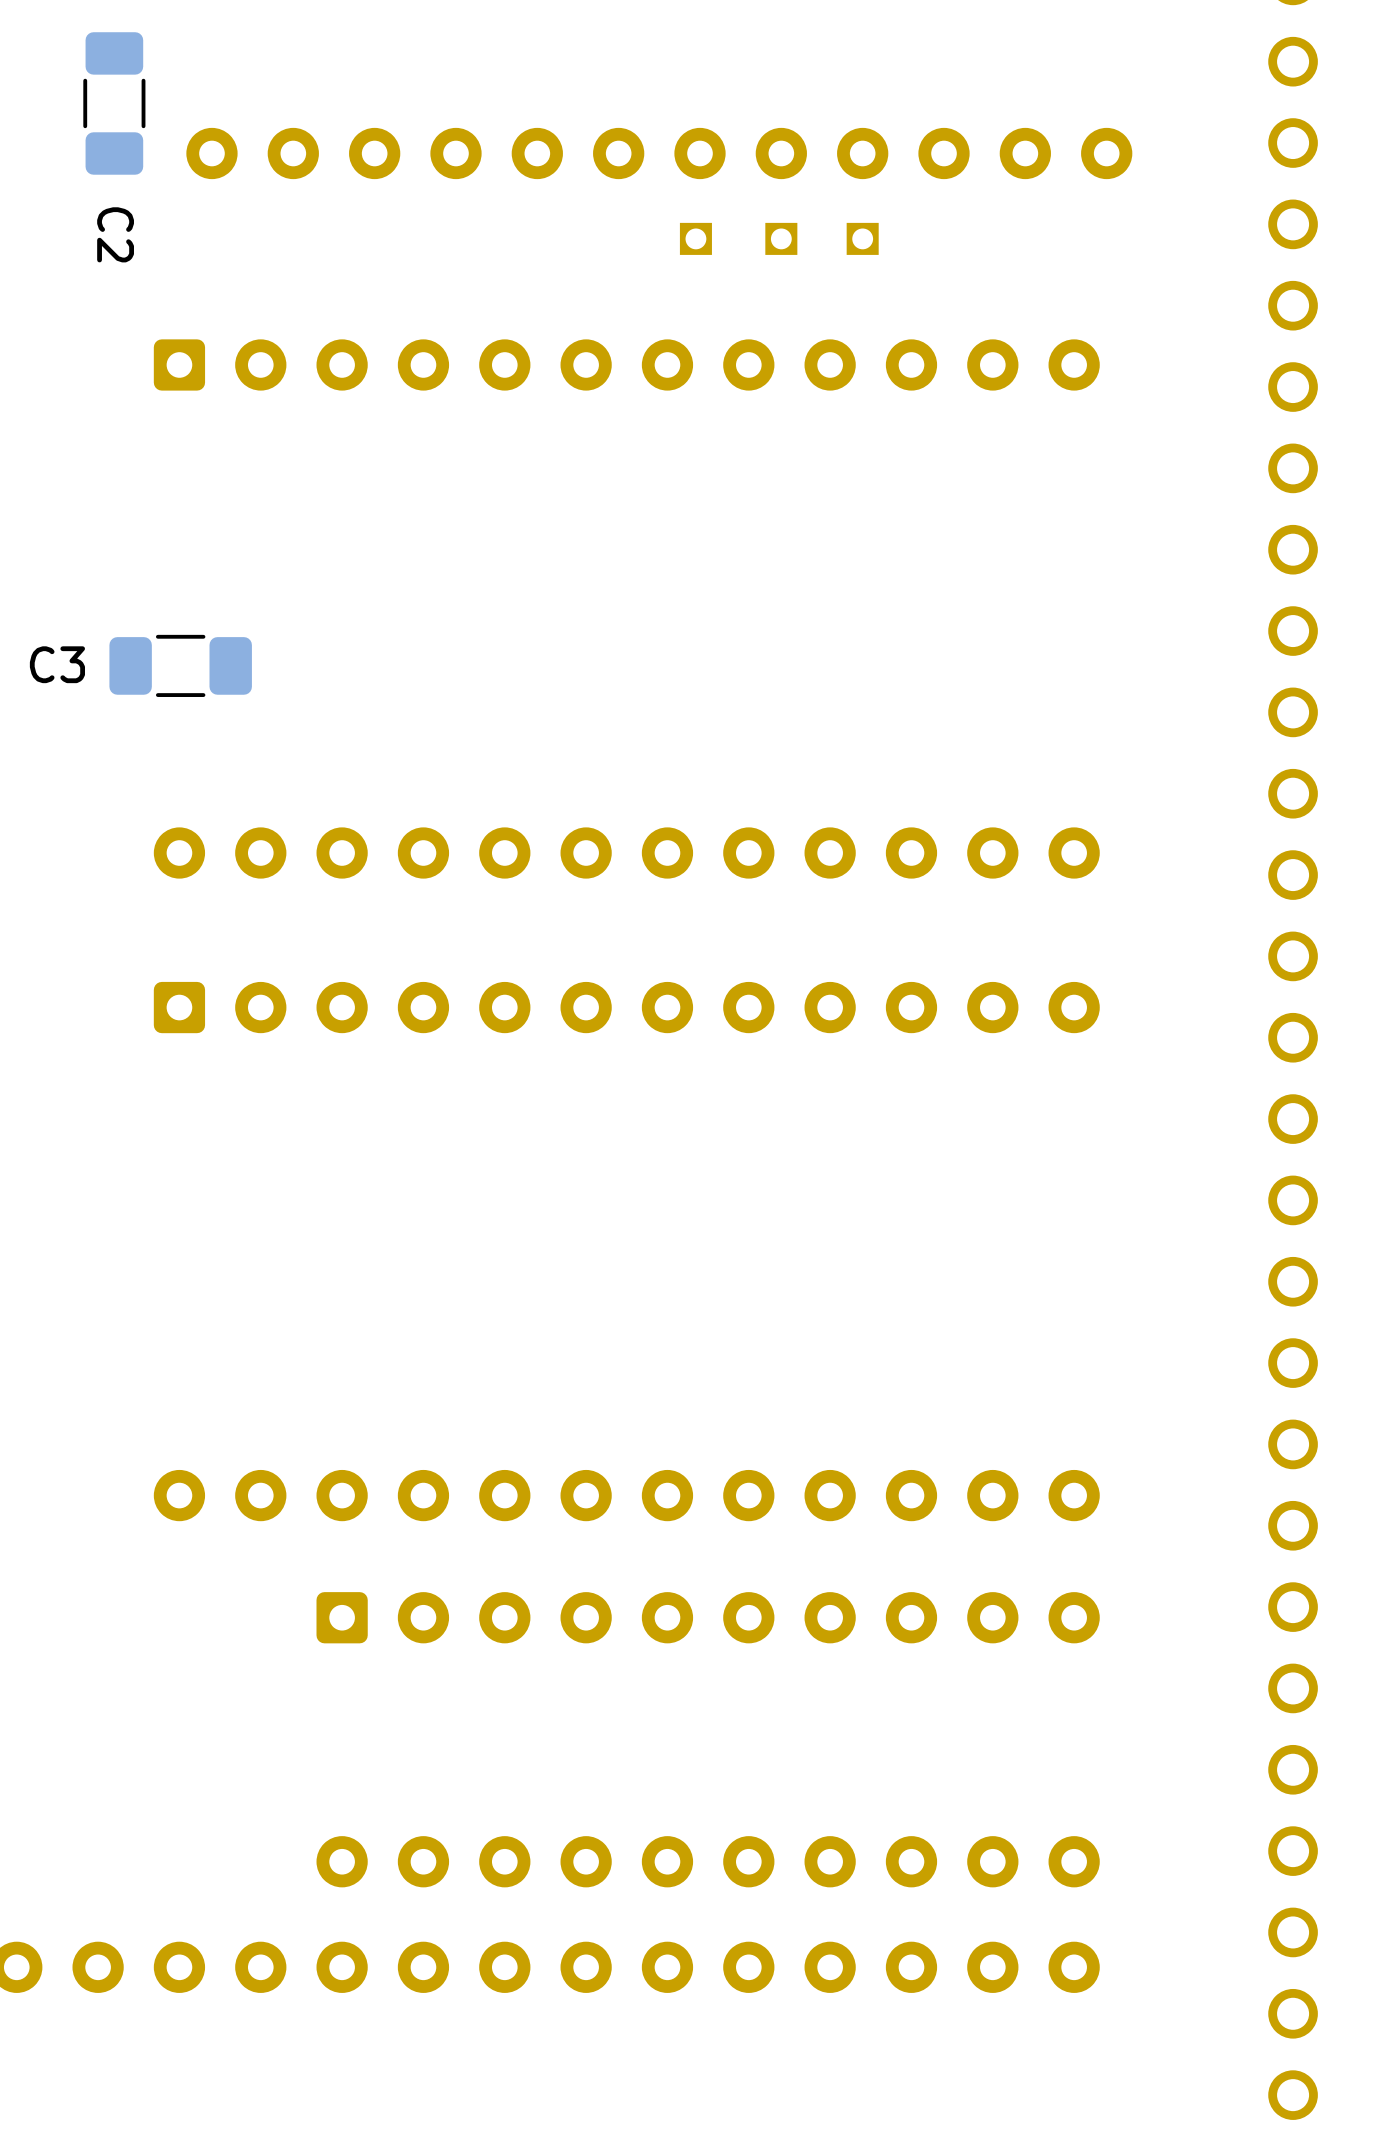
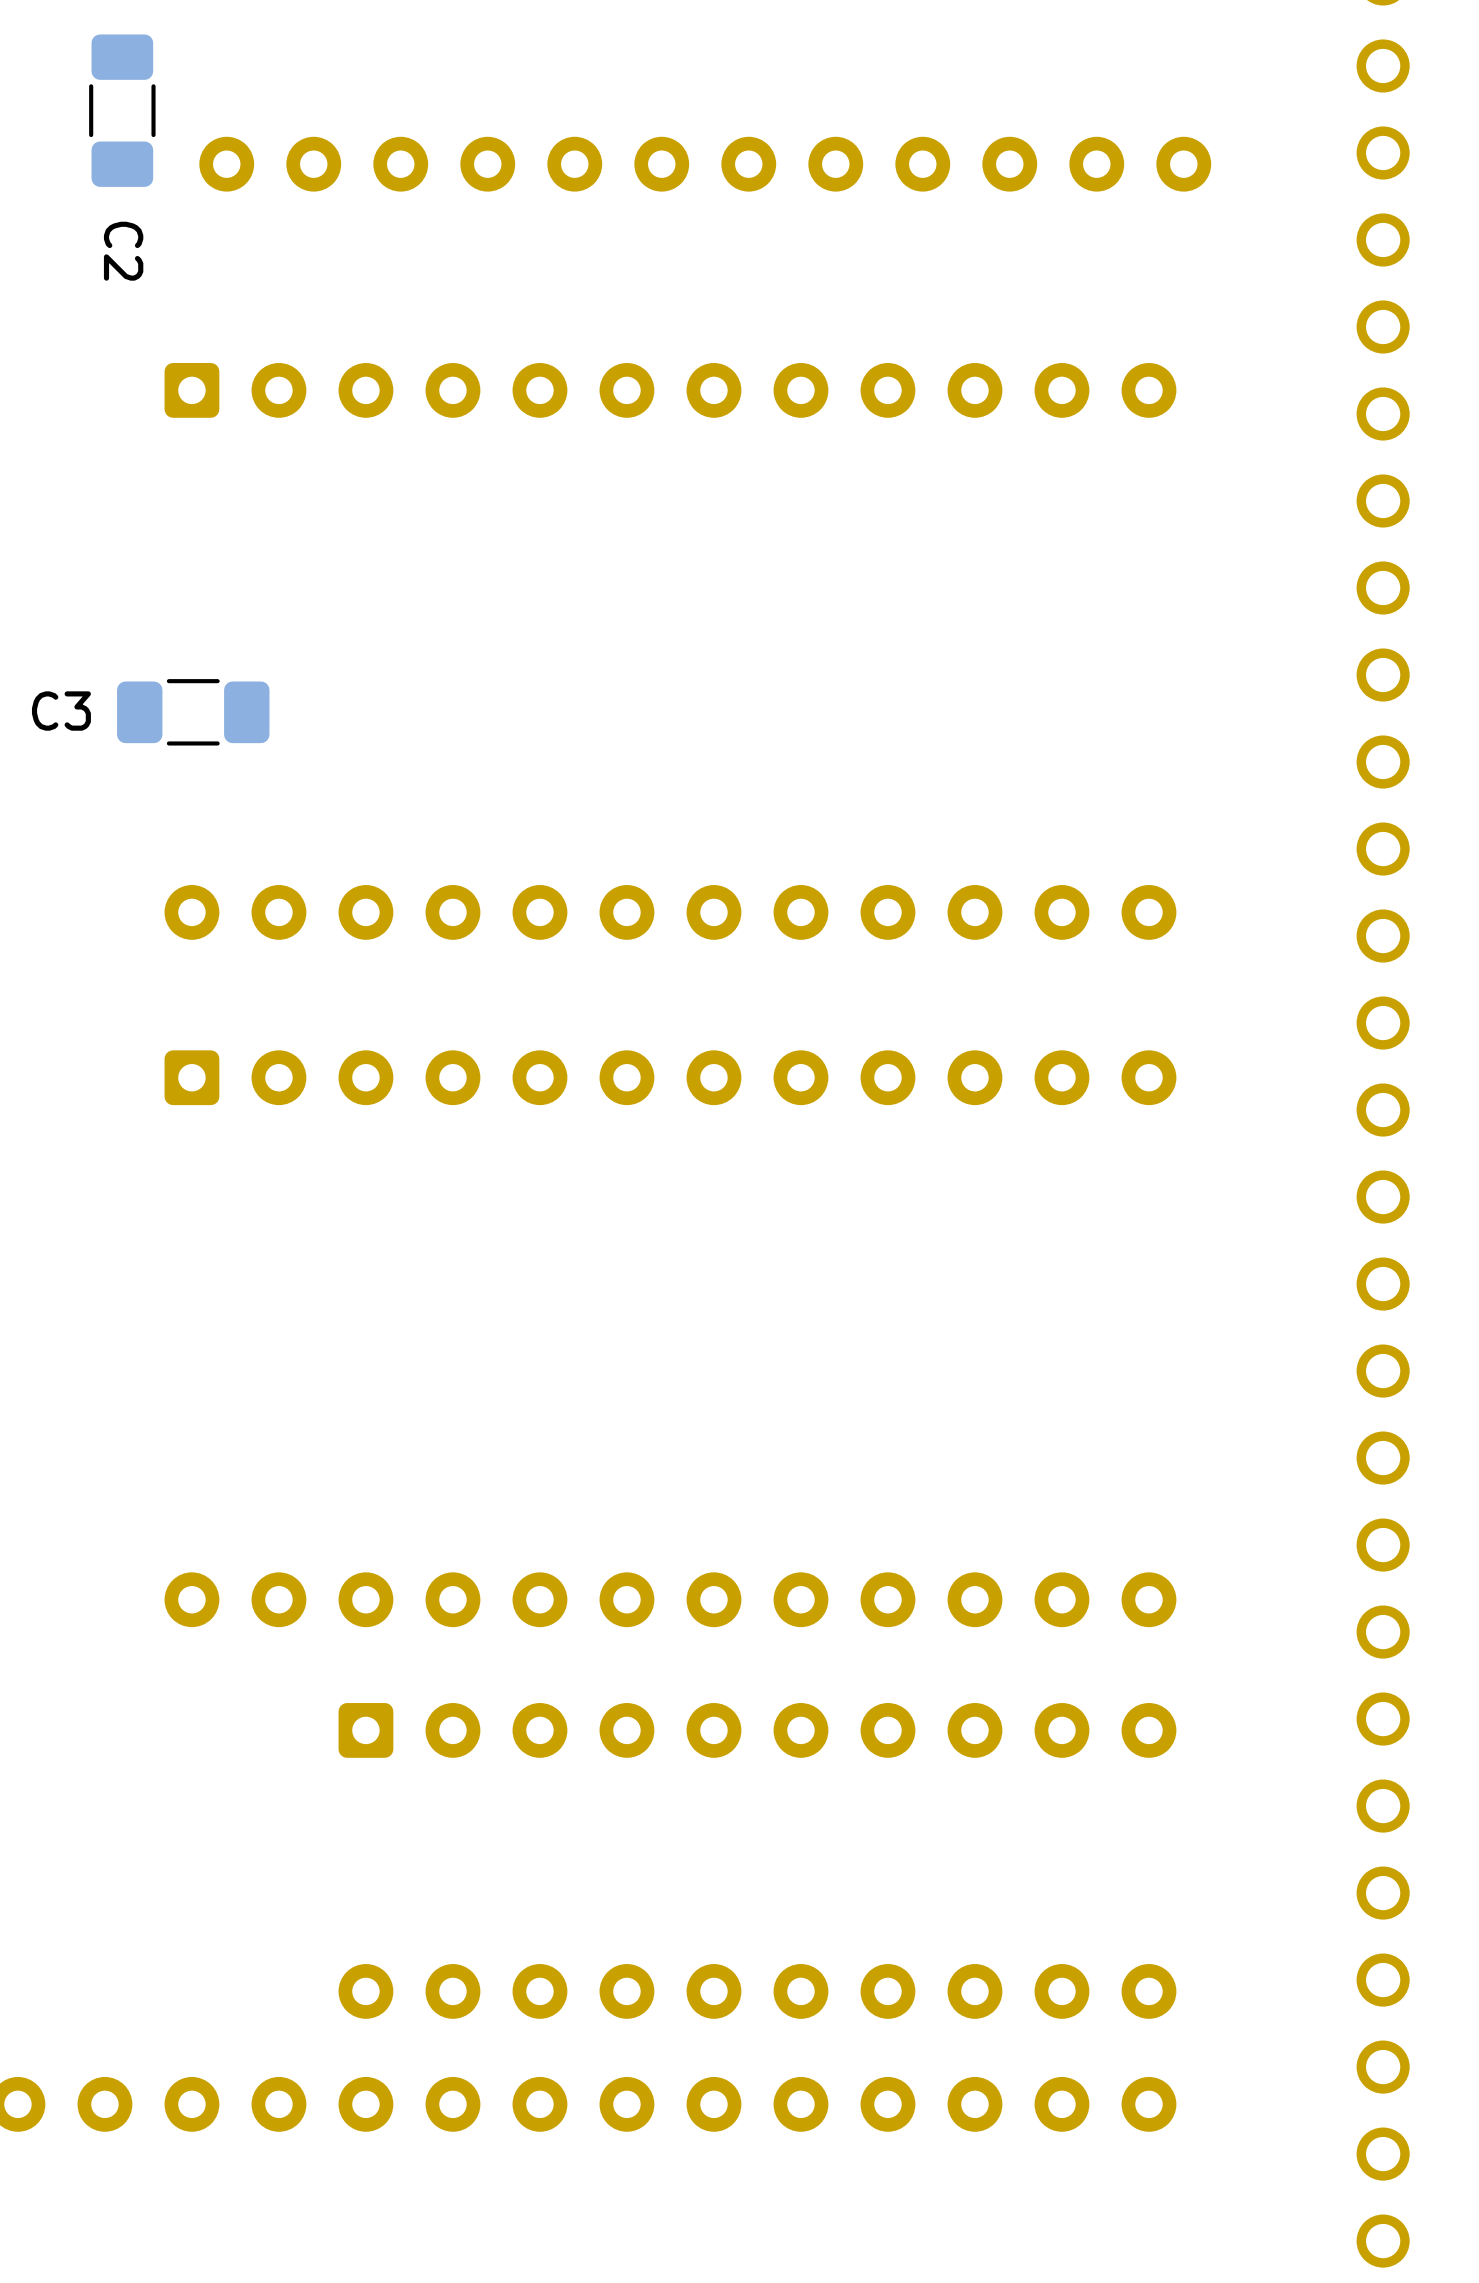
part: (695, 238) -> none
part: (781, 238) -> none
part: (862, 238) -> none

